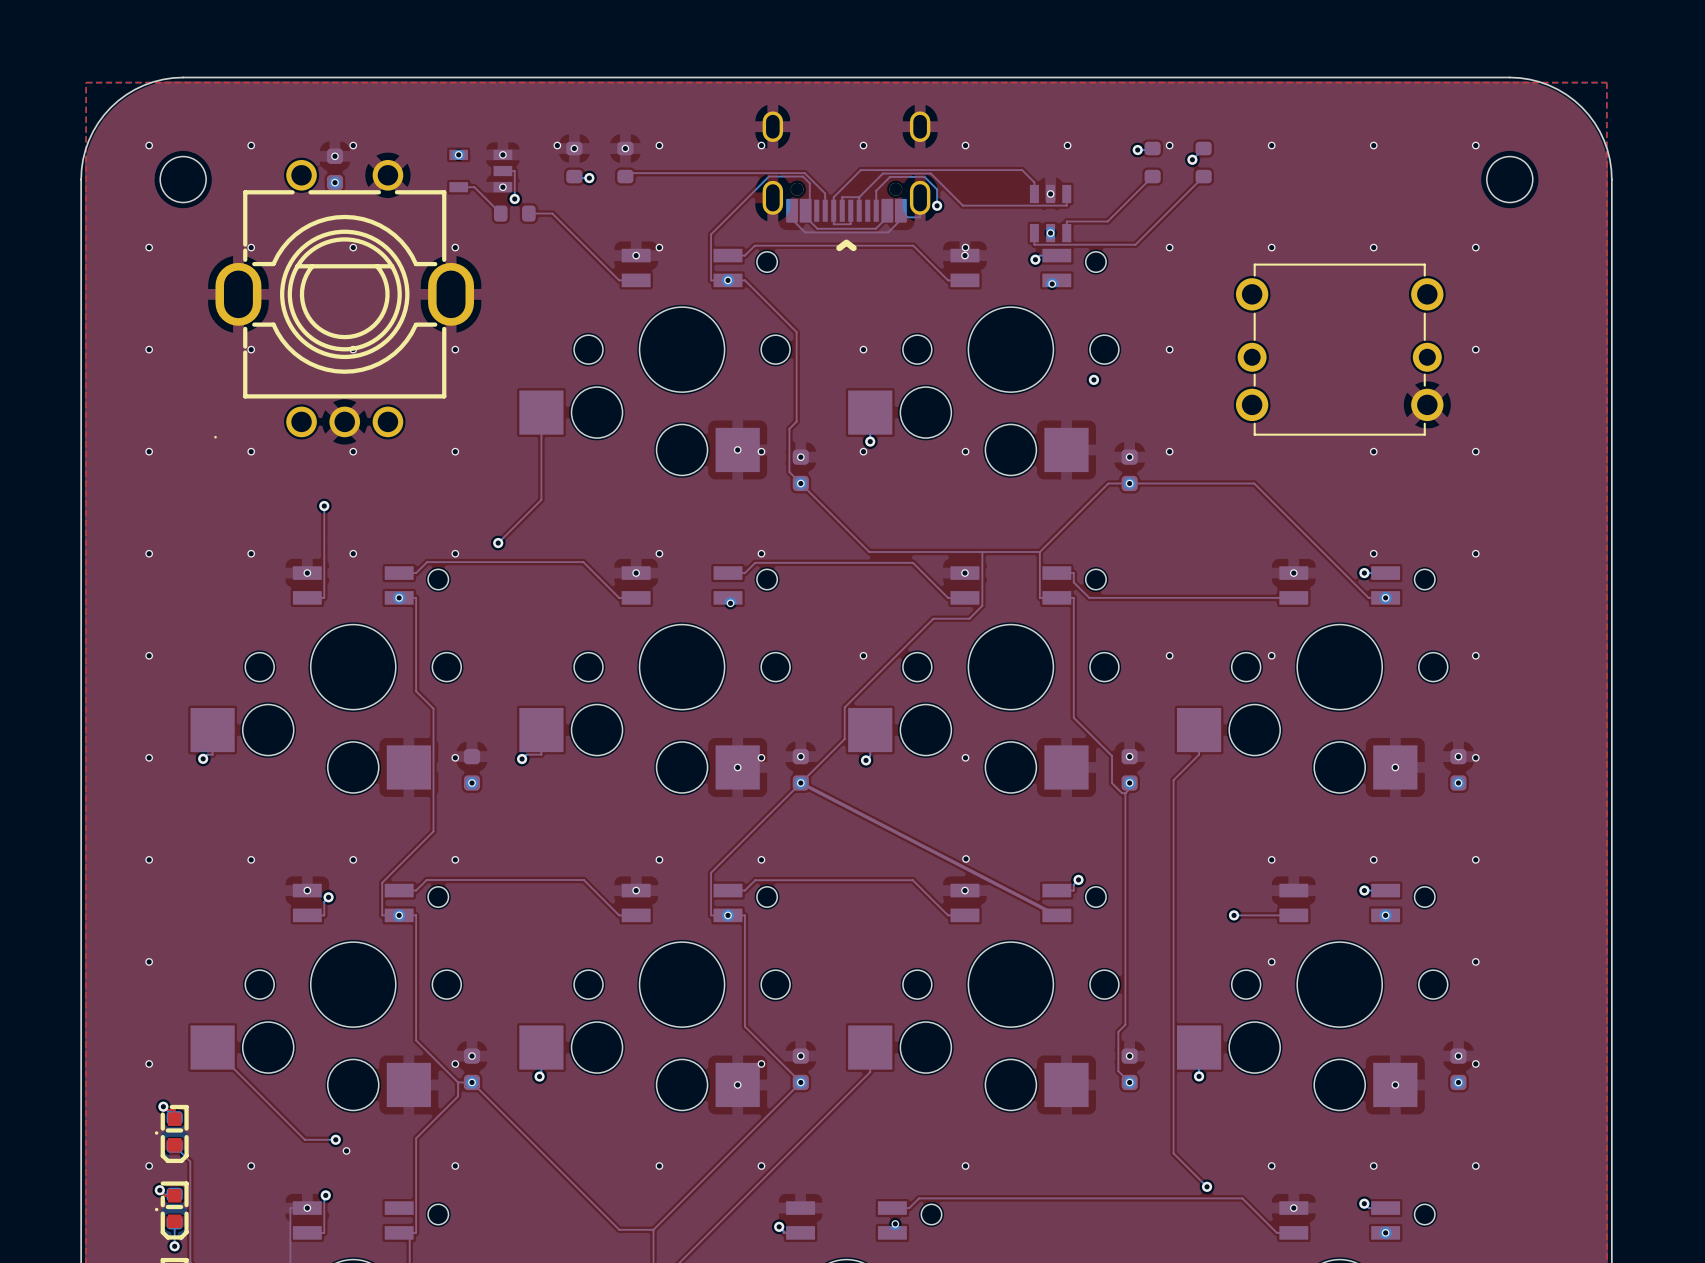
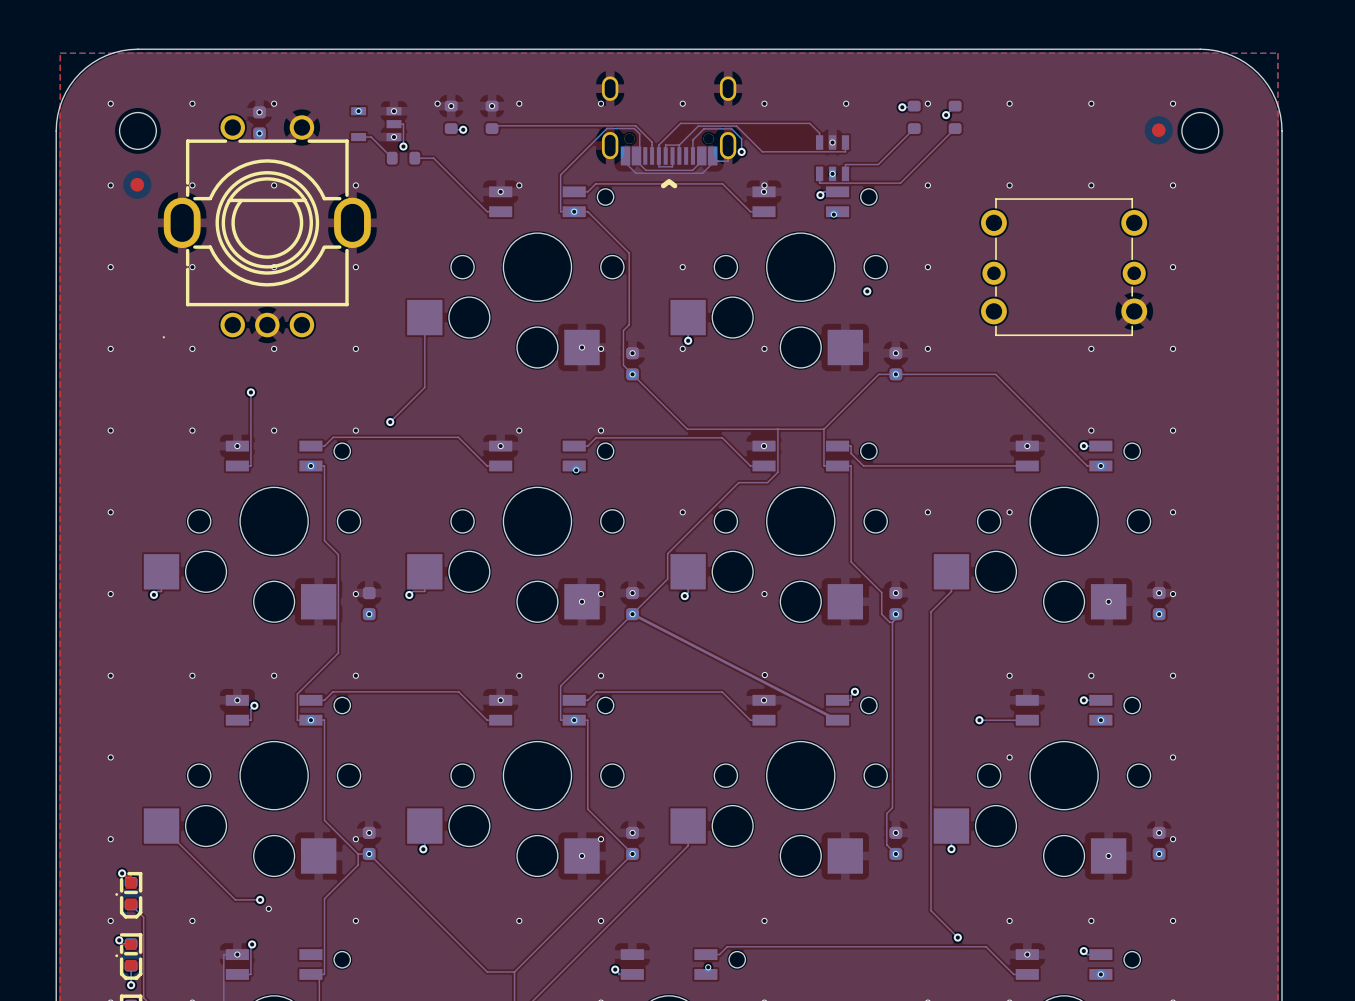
part: none -> (1158, 130)
part: none -> (137, 184)

